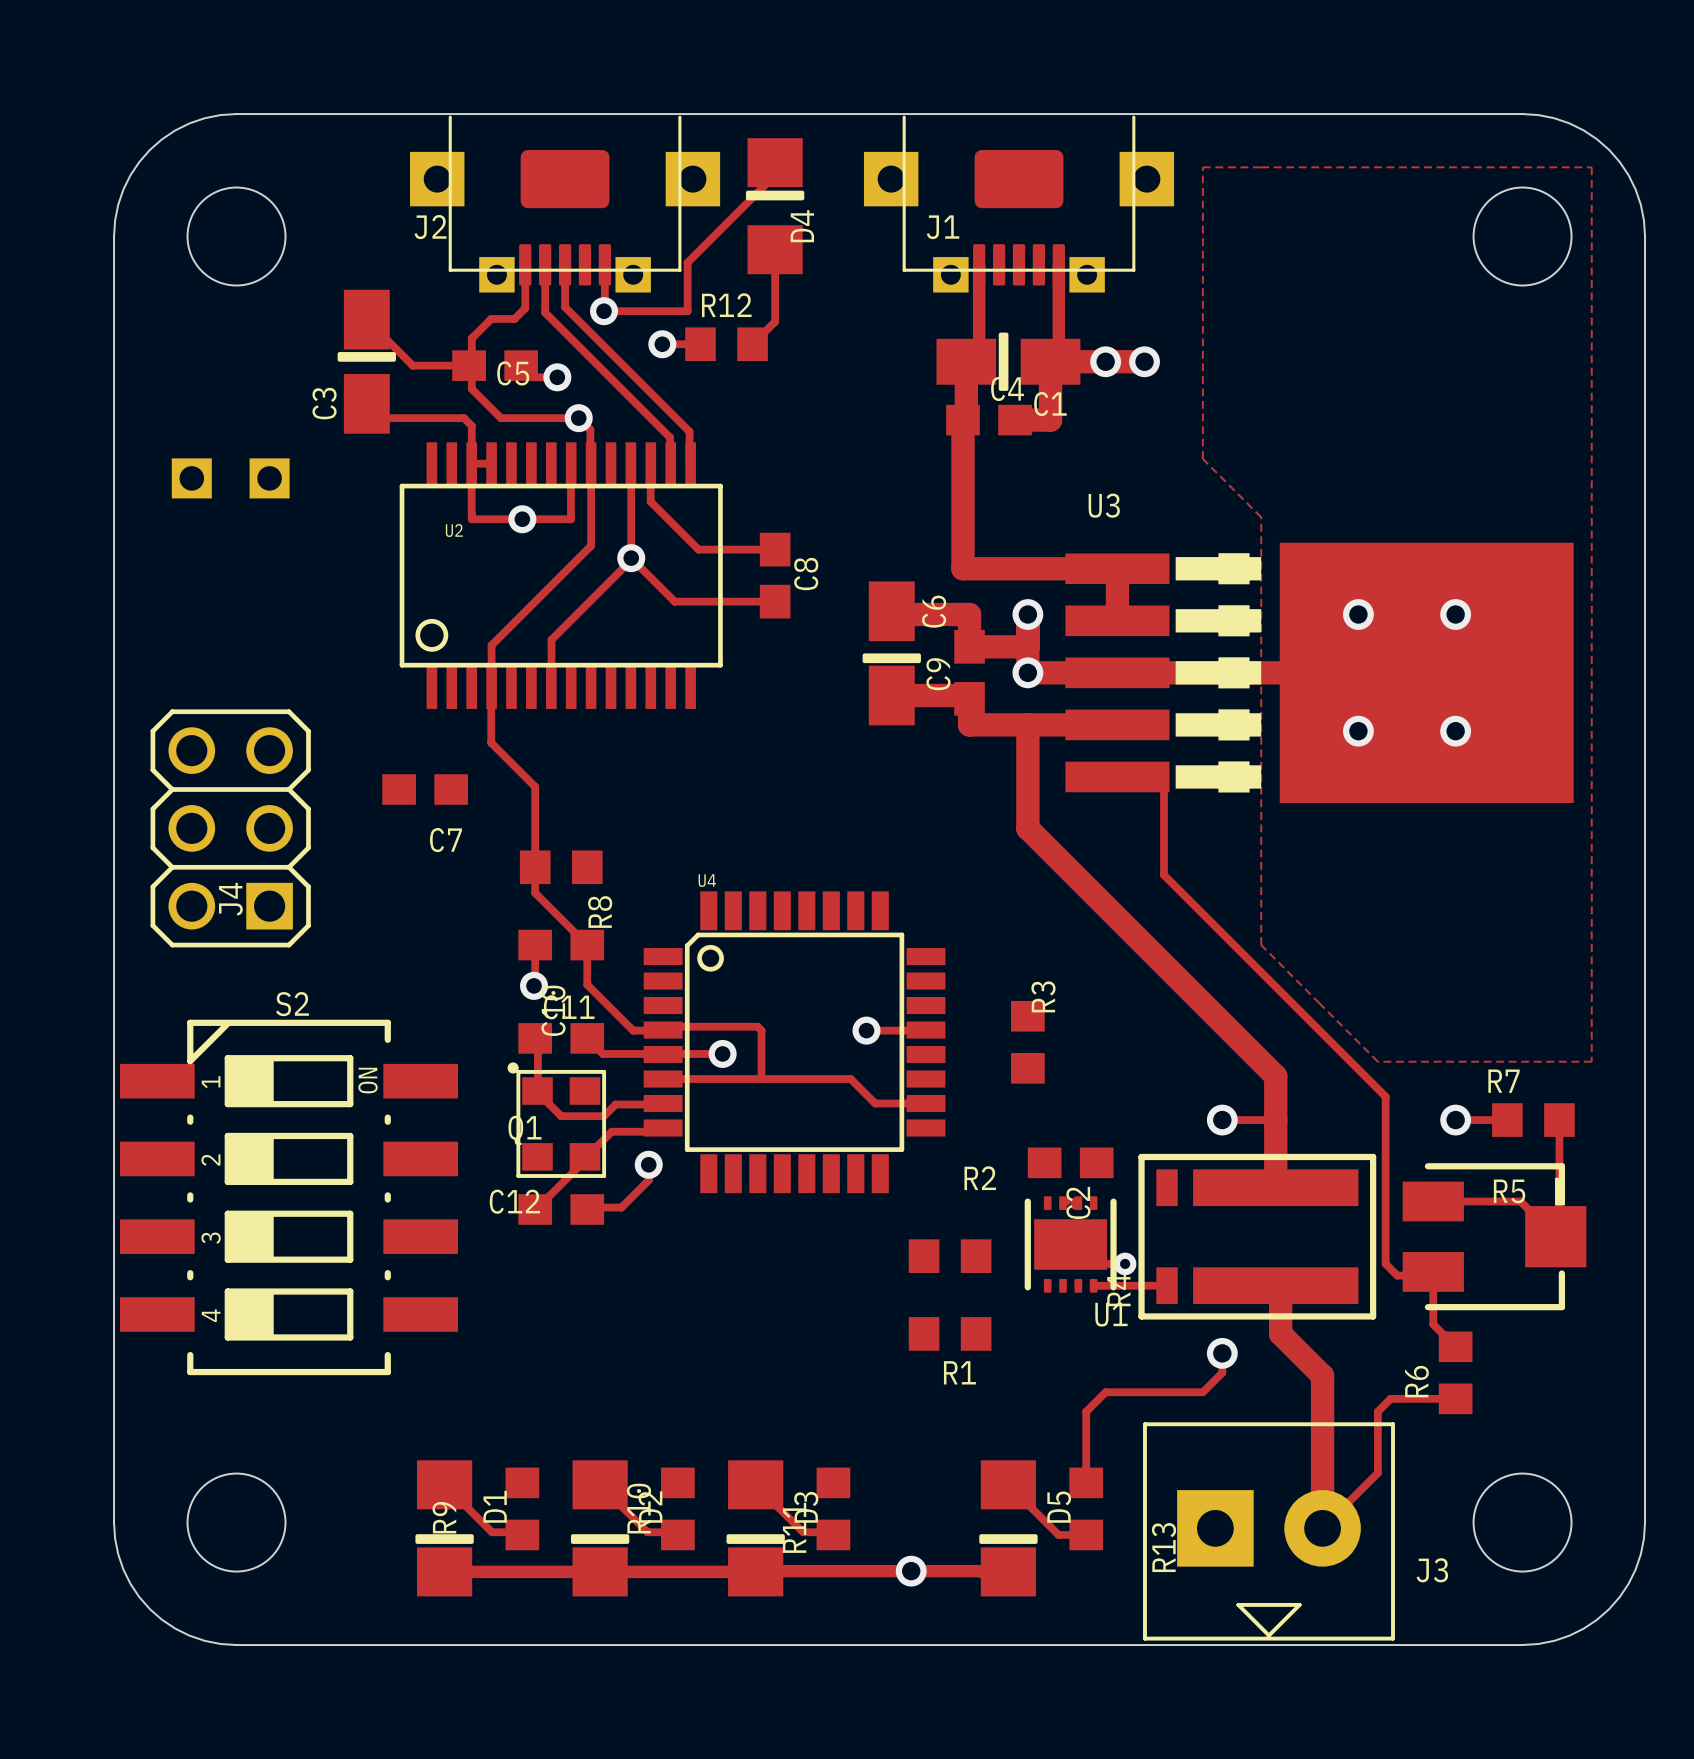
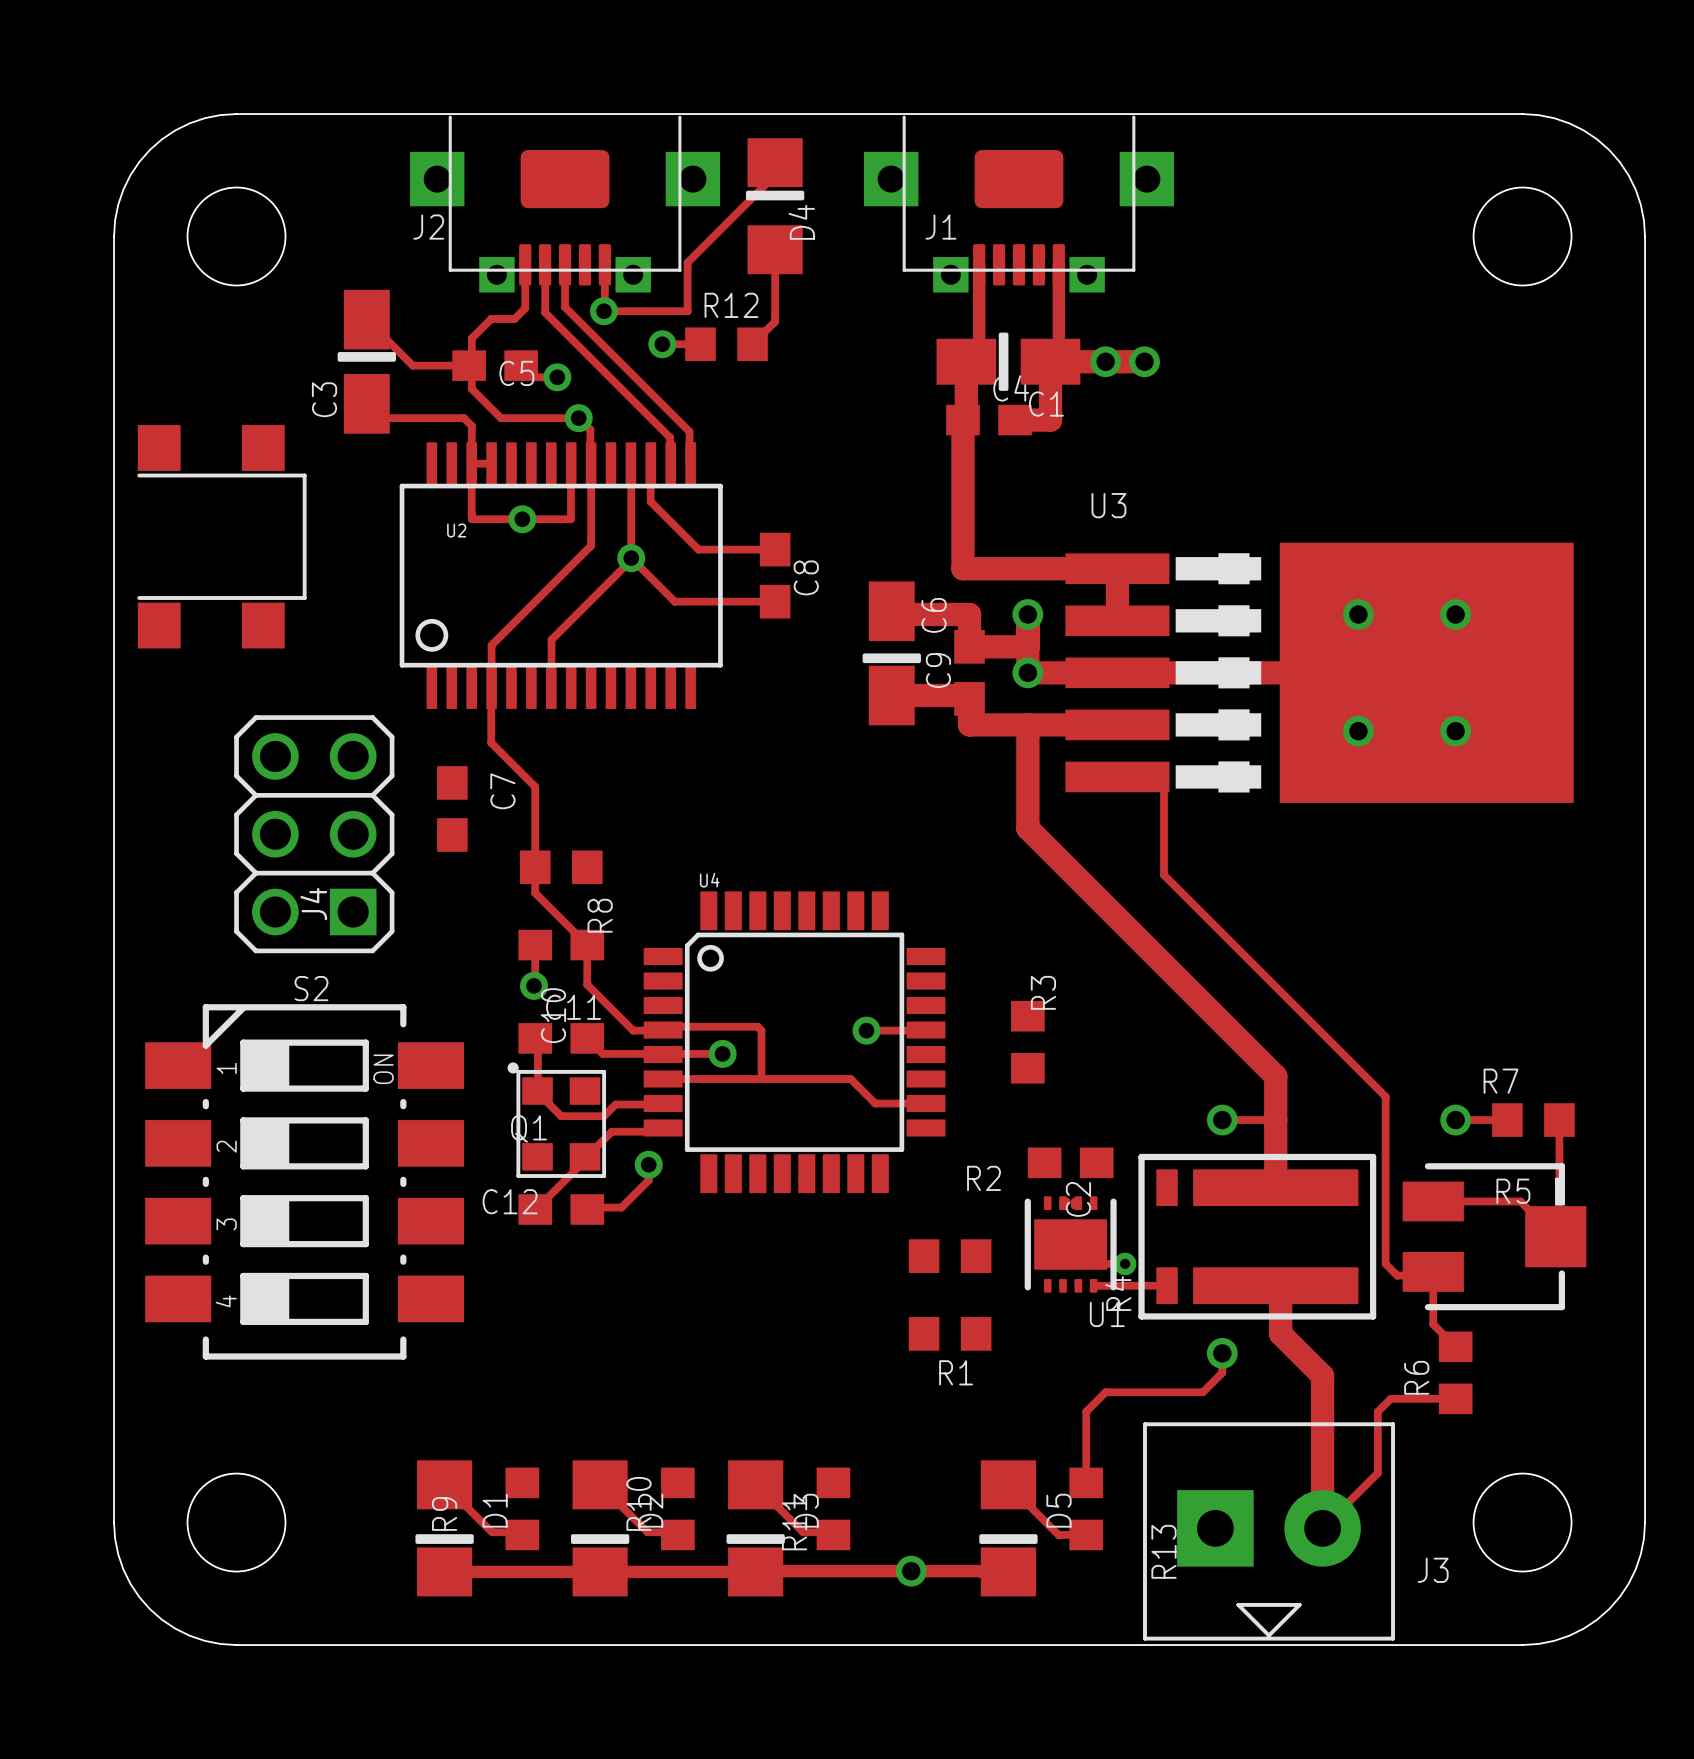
zone outline: (1202, 167) (1591, 167) (1591, 1061) (1377, 1061) (1261, 945) (1261, 517) (1202, 458) (1202, 167) -> none
part: (230, 478) -> none
part: none -> (221, 536)
C7 rotation: 0° (425, 789) -> 90° clockwise (452, 808)
J4 position: (230, 828) -> (314, 834)
C7 name position: C7 (445, 840) -> C7 (502, 791)
S2 footprint: [120, 1019, 459, 1376] -> [145, 1004, 465, 1360]

